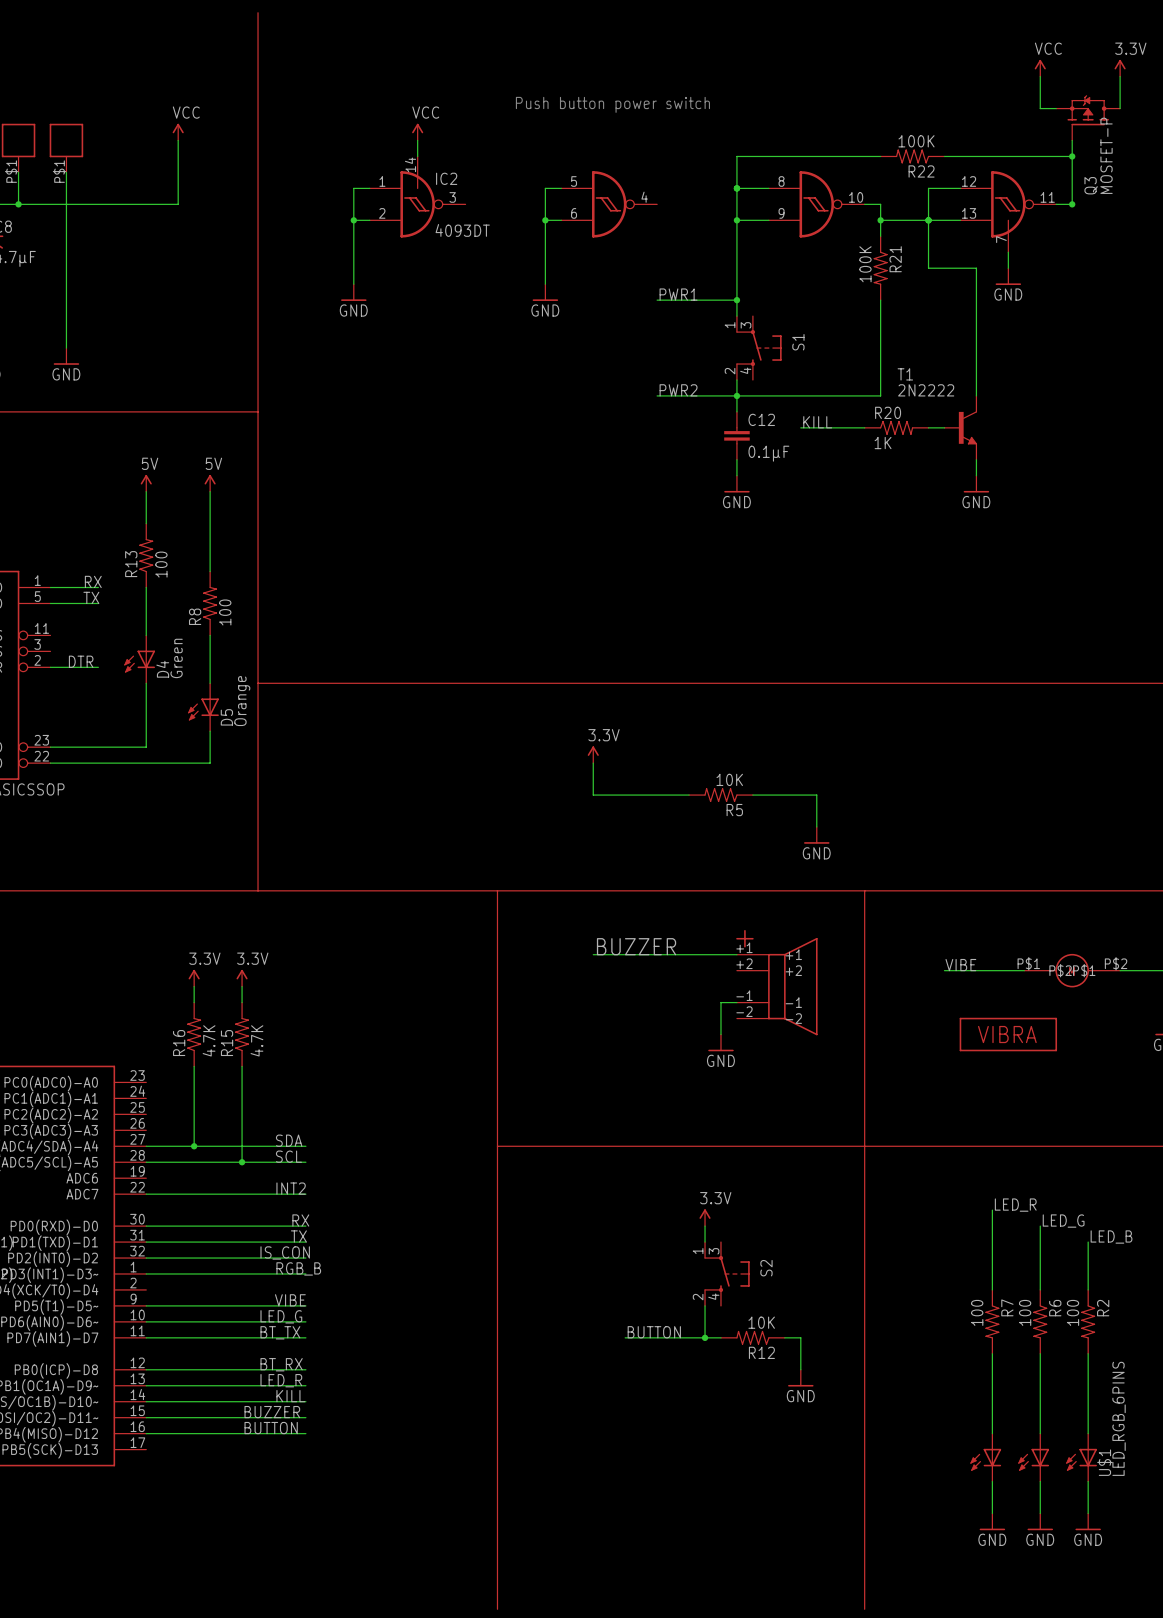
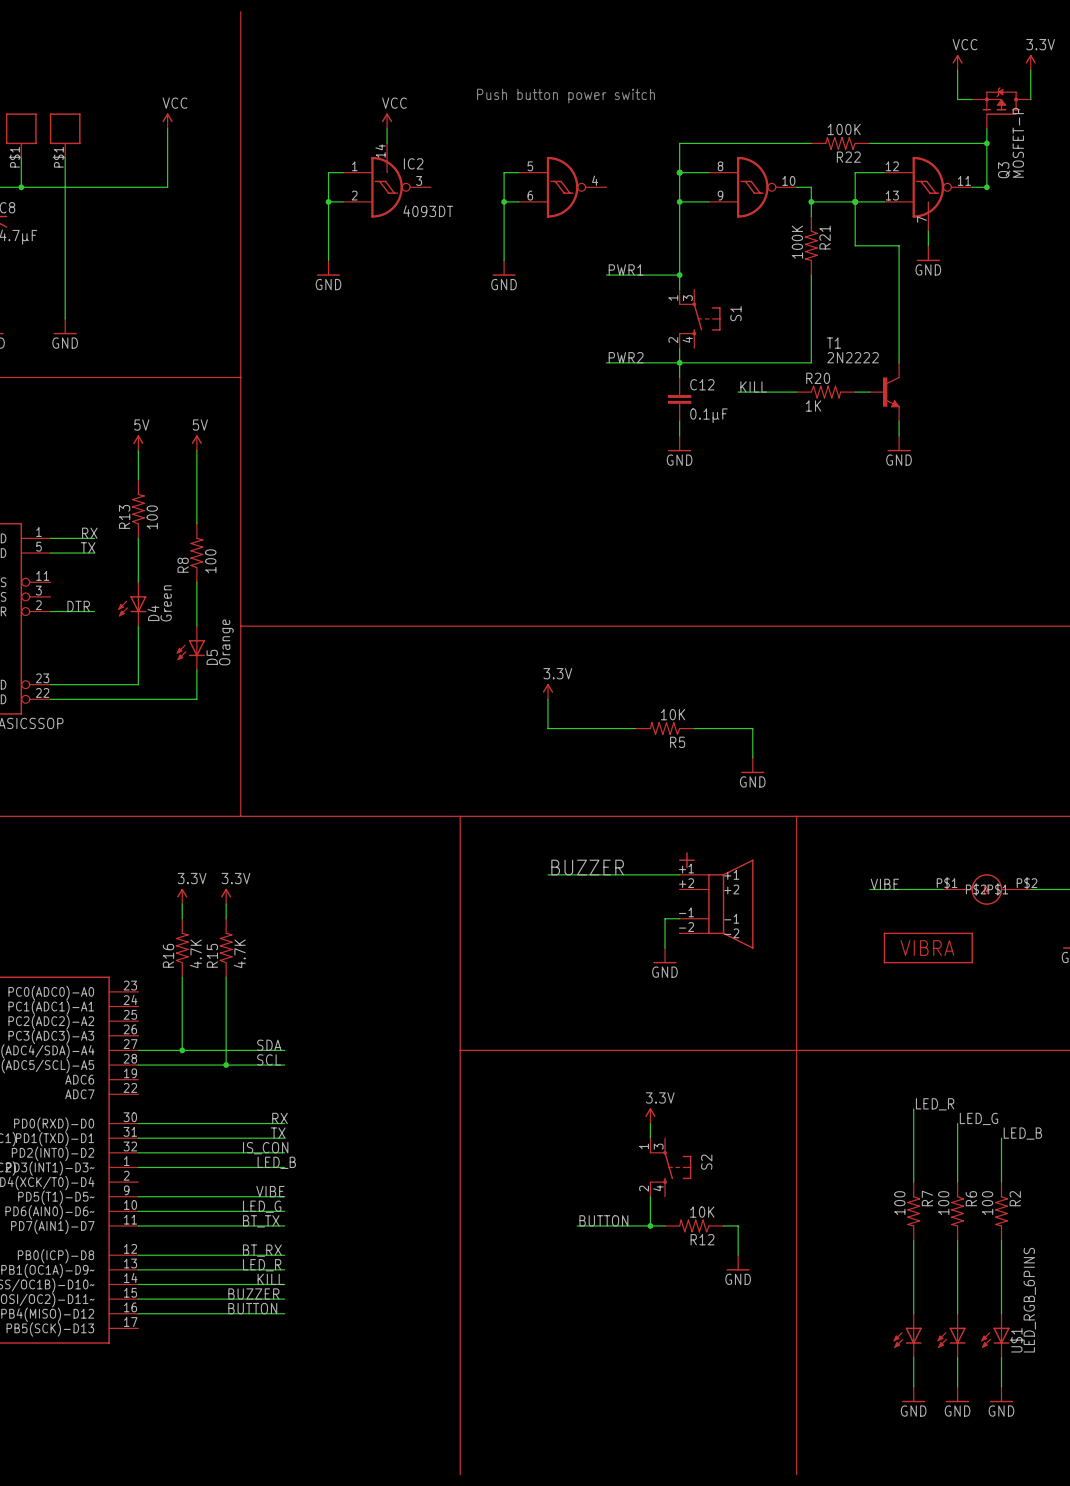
label: INT2 (291, 1188) -> none
wire: (146, 1194) (305, 1194) -> none
label: RGB_B (298, 1268) -> LED_B (276, 1162)

